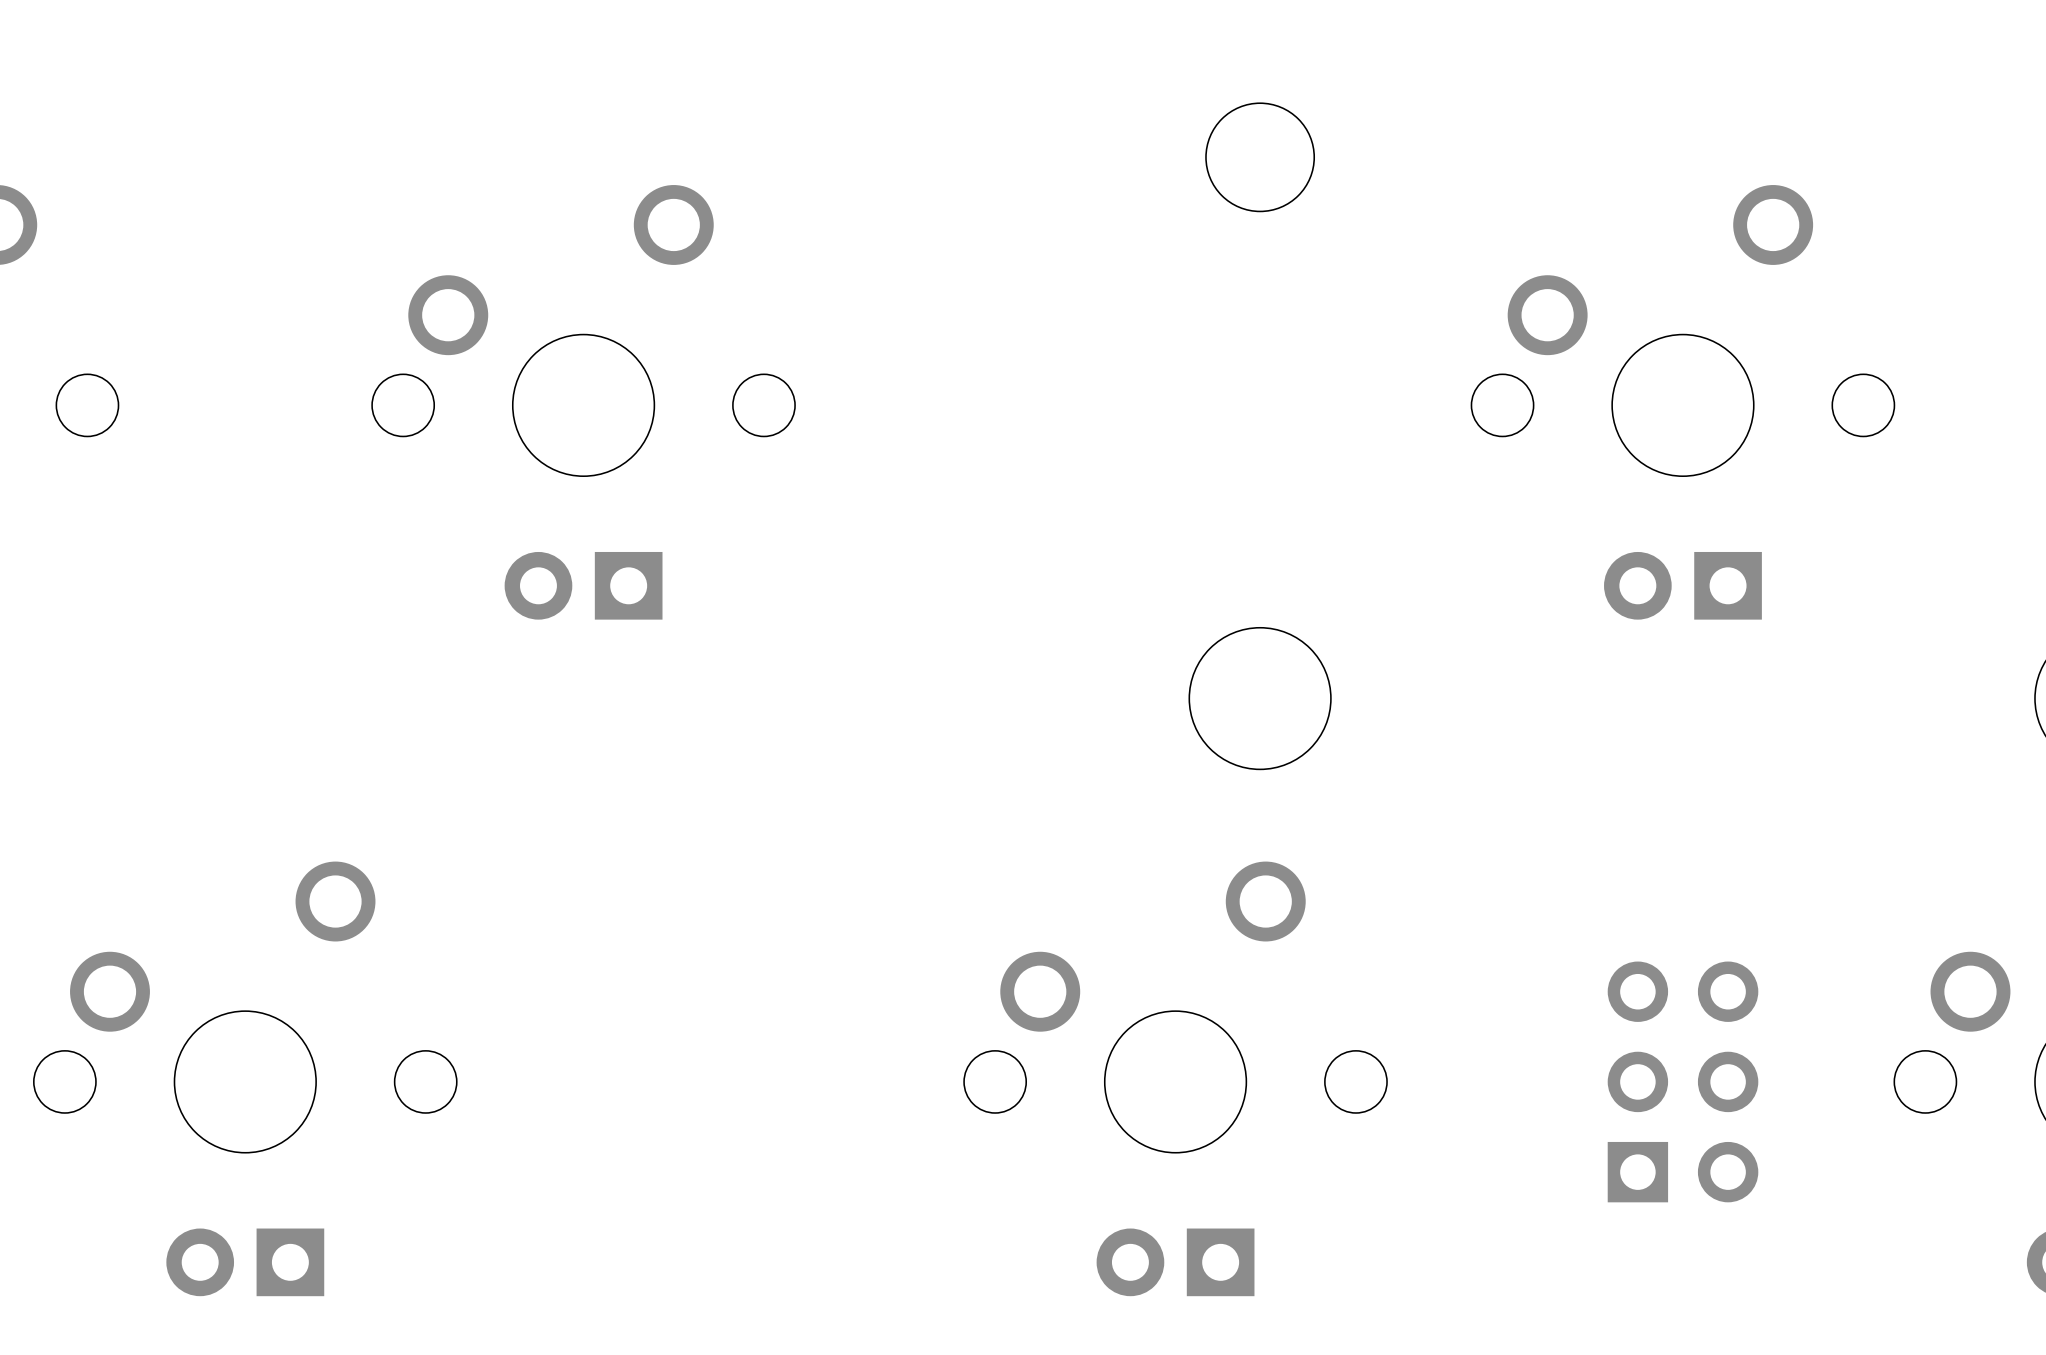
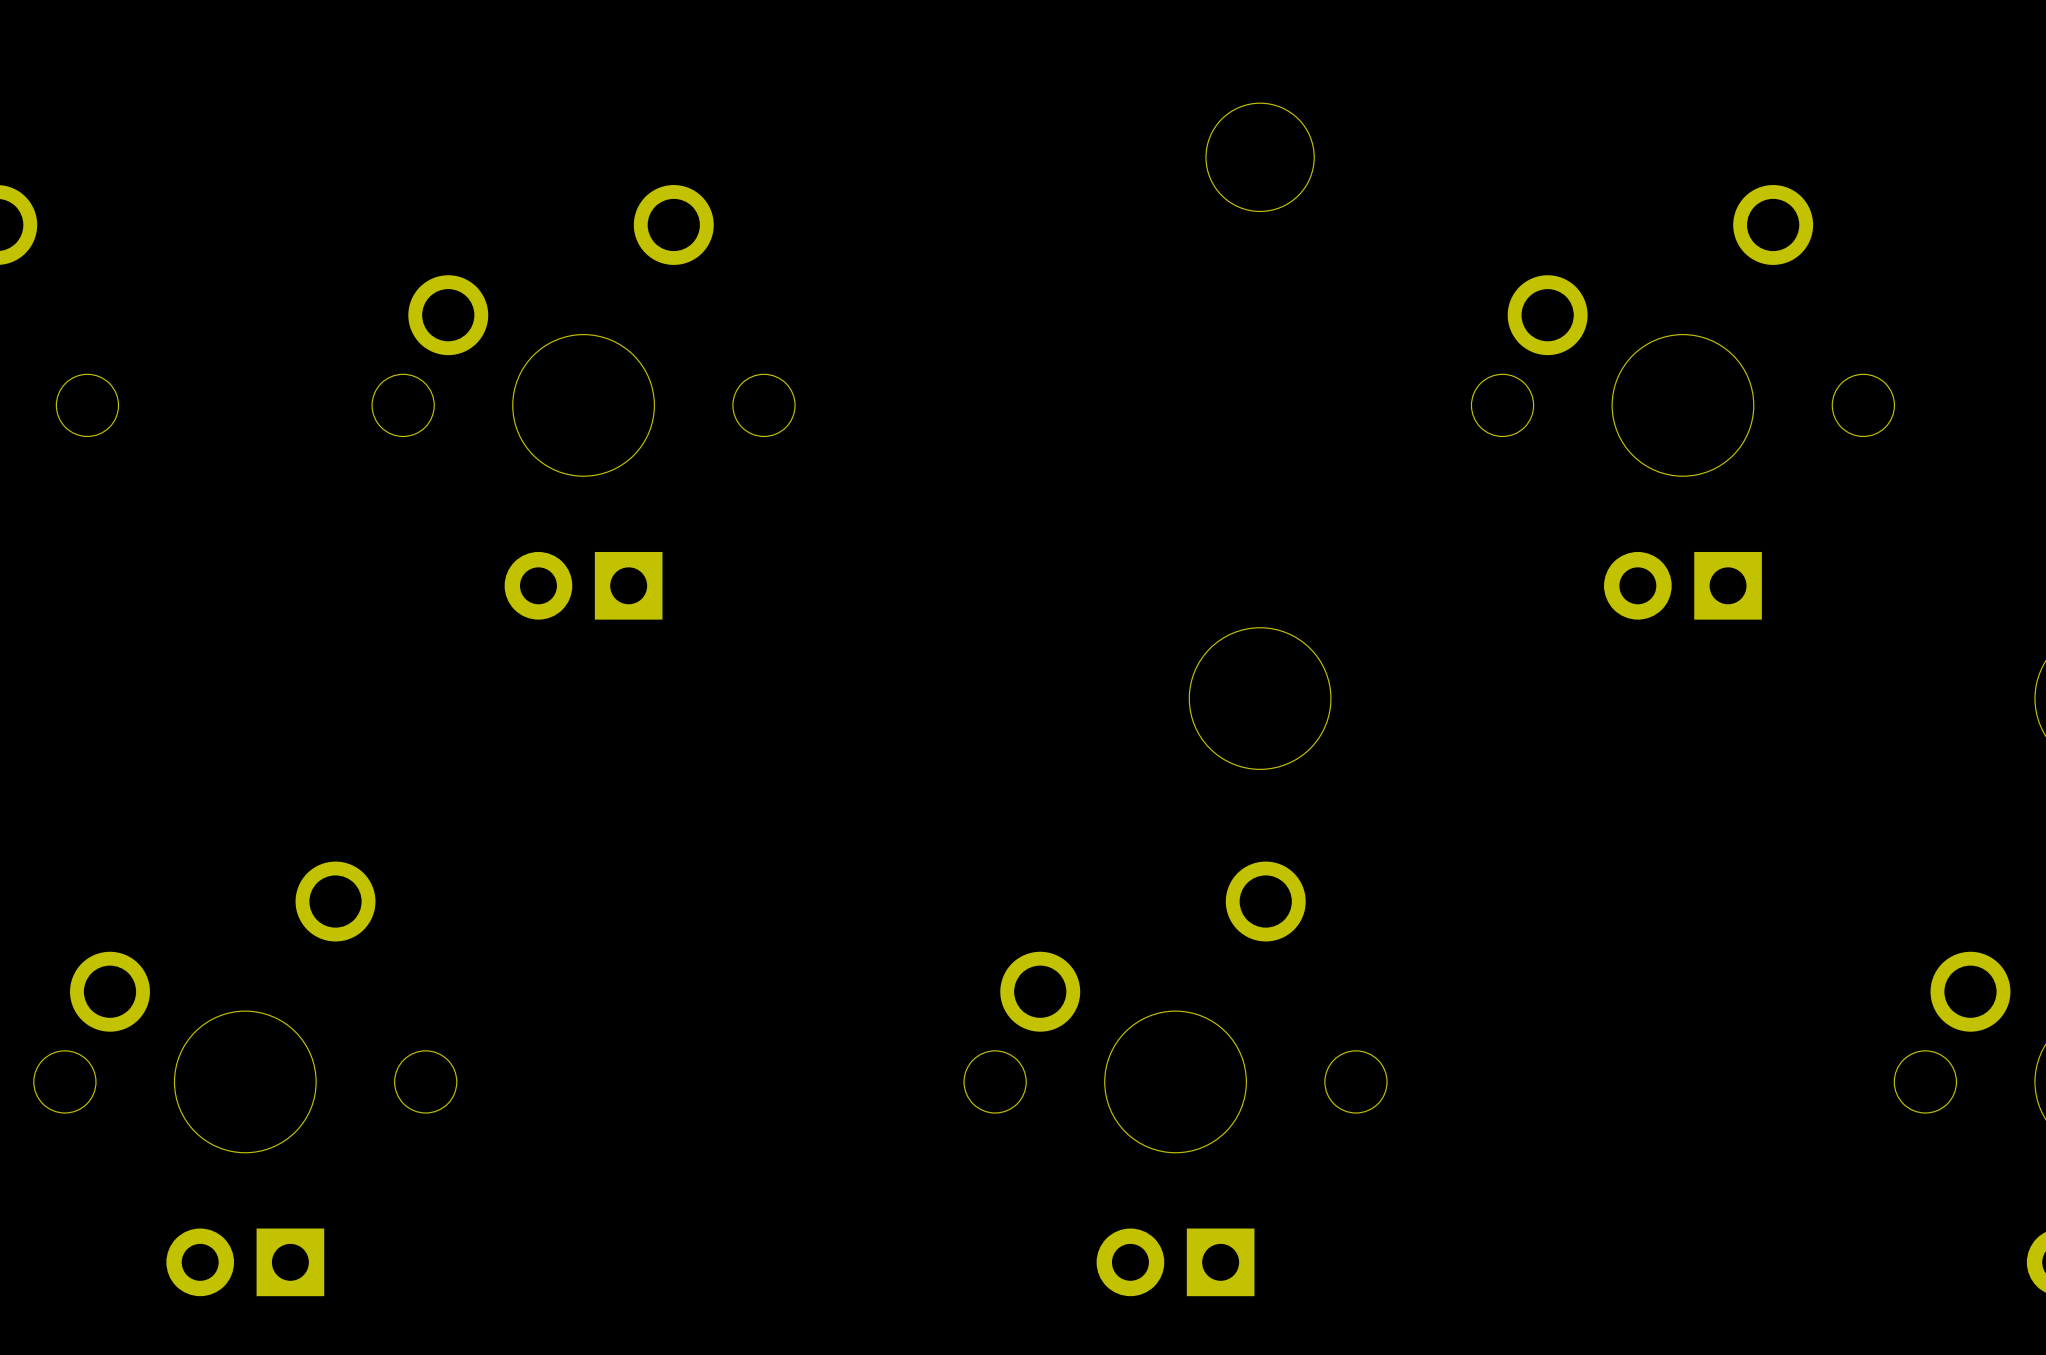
part: (1683, 1081) -> none

